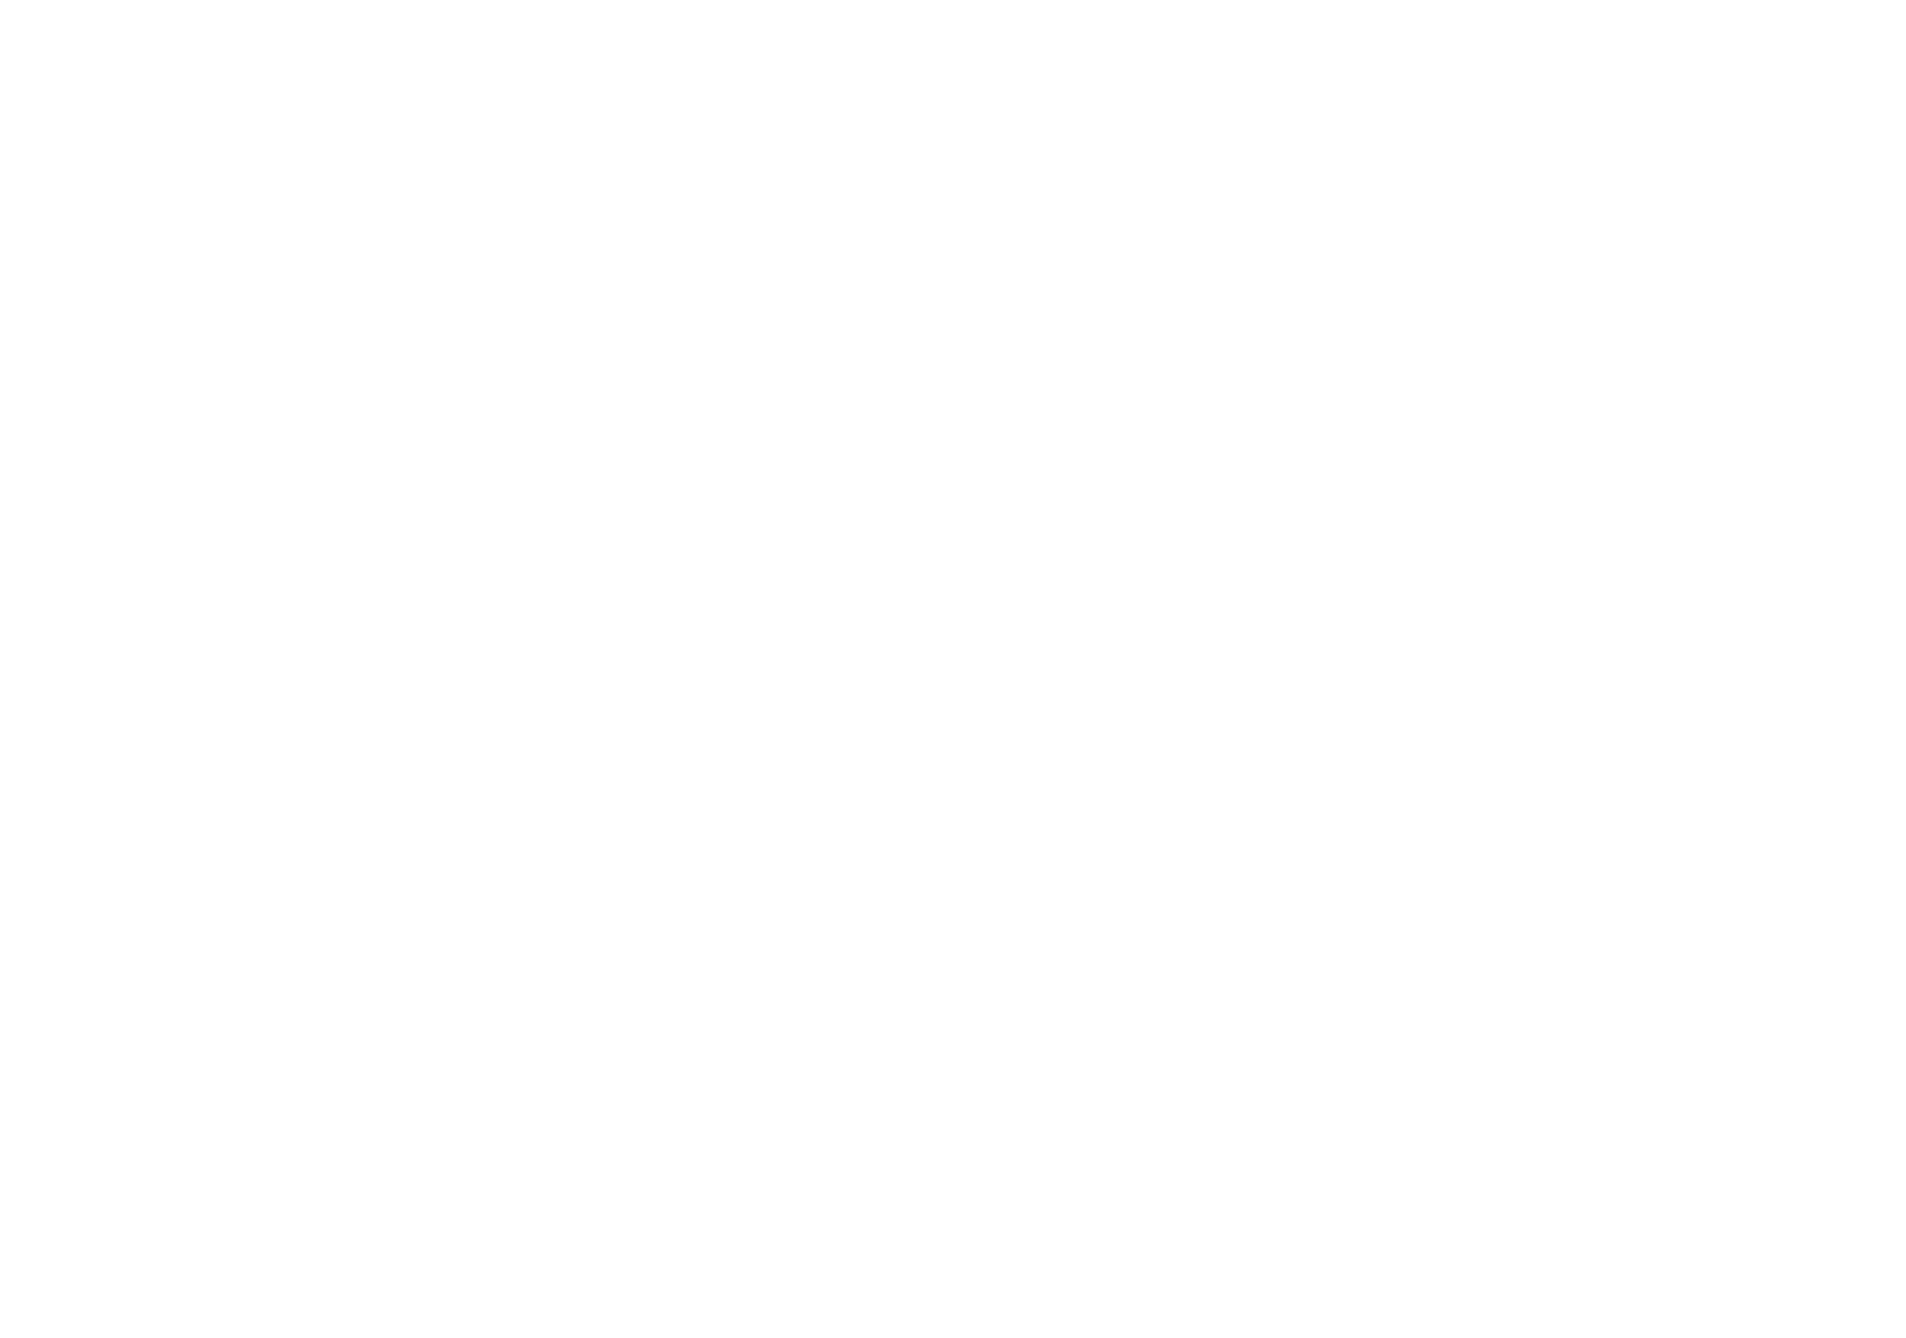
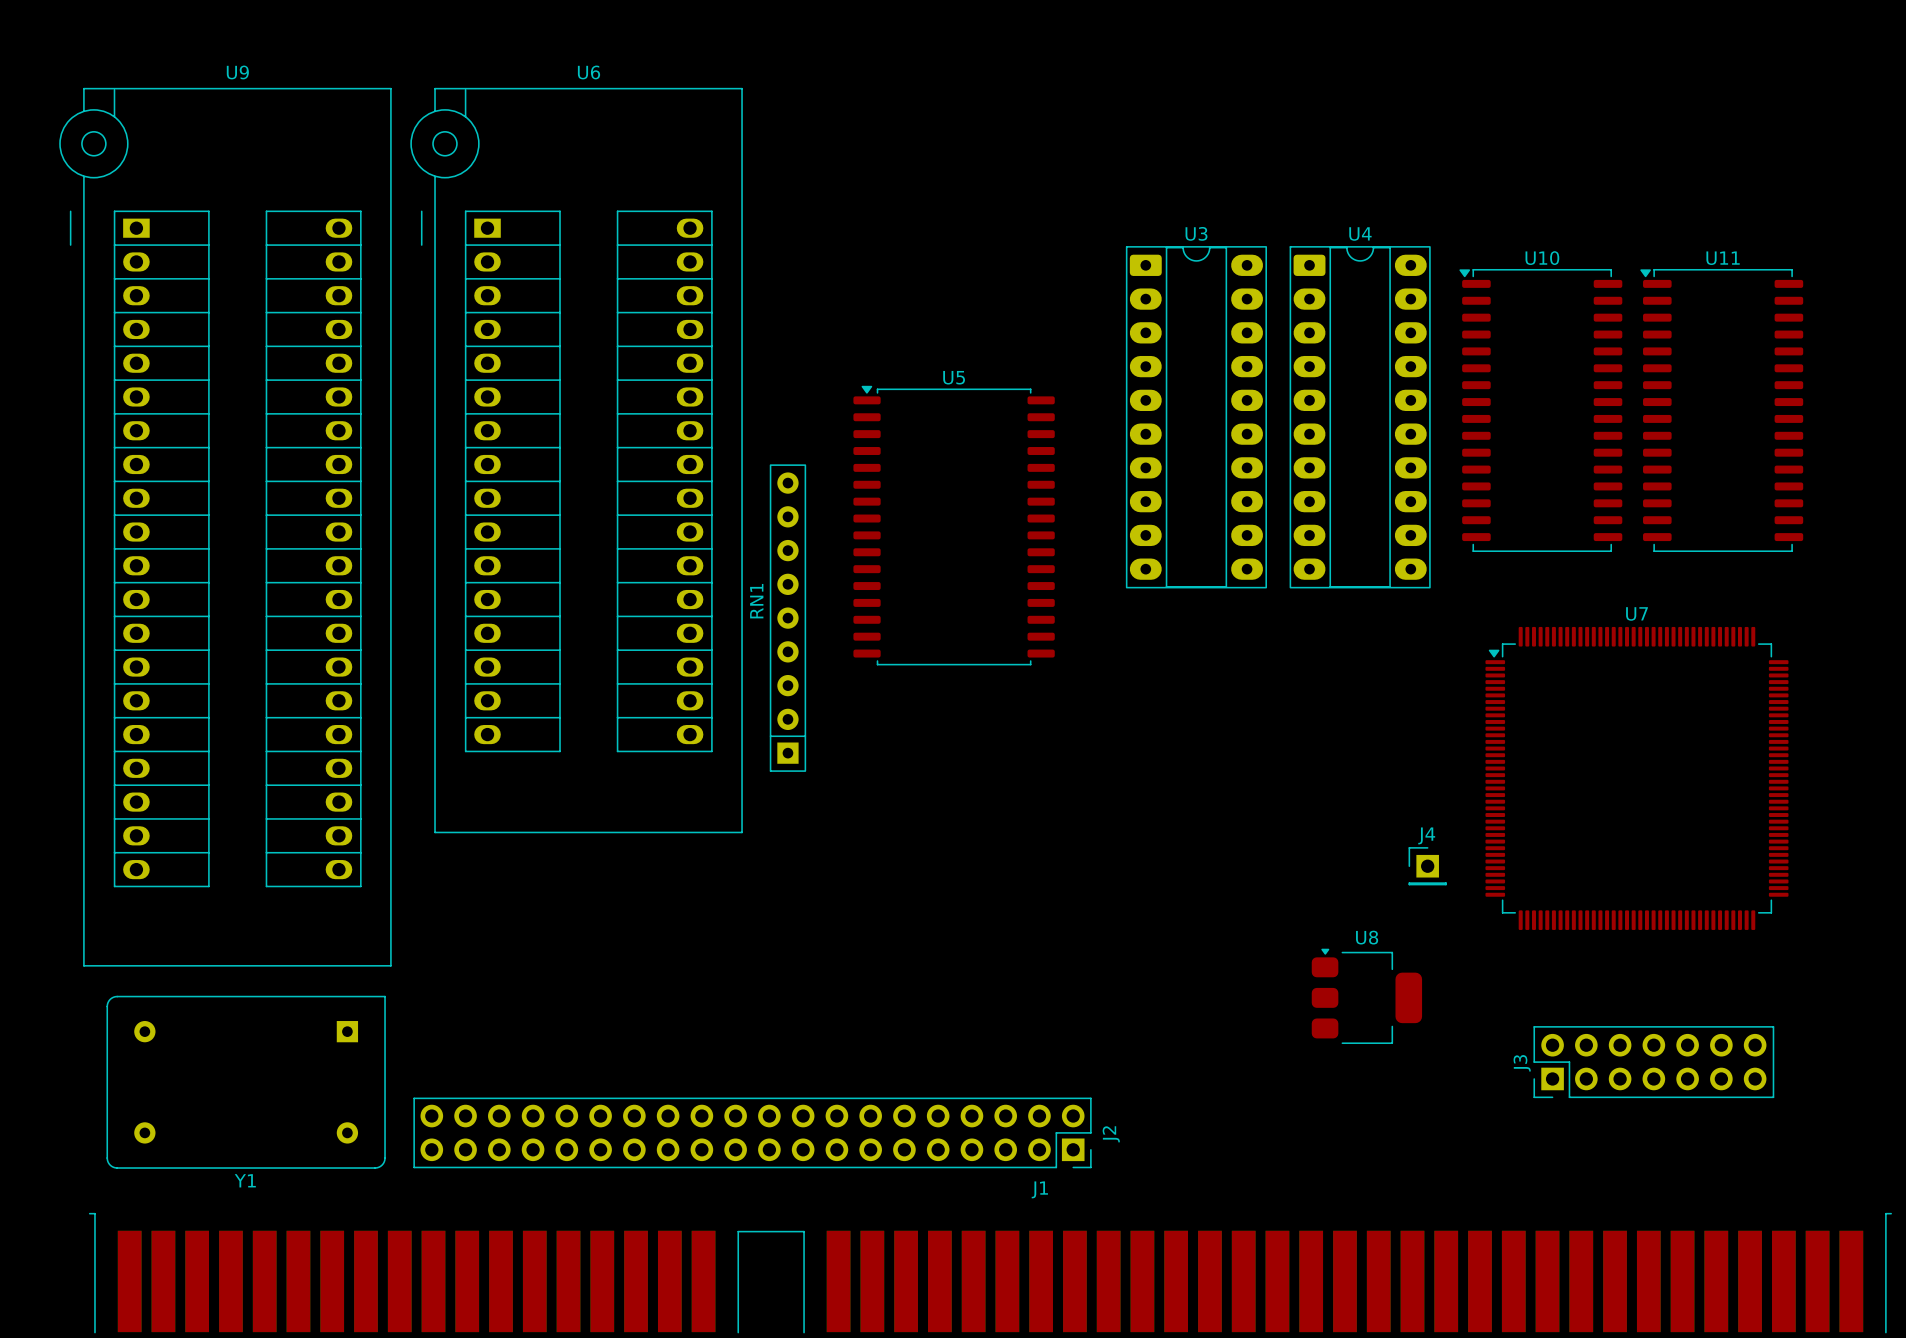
U10: none -> (1540, 410)
U11: none -> (1721, 410)
U3: none -> (1196, 417)
U4: none -> (1360, 417)
U6: none -> (576, 460)
U5: none -> (954, 525)
U9: none -> (225, 527)
RN1: none -> (787, 618)
U7: none -> (1636, 778)
J4: none -> (1427, 866)
U8: none -> (1366, 996)
J3: none -> (1653, 1062)
Y1: none -> (246, 1082)
J2: none -> (752, 1132)
J1: none -> (990, 1273)

